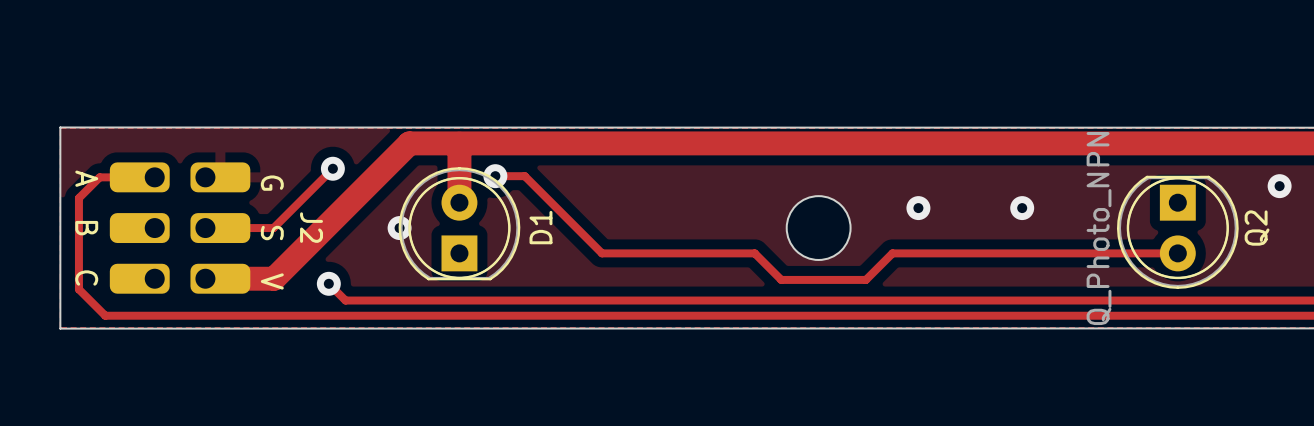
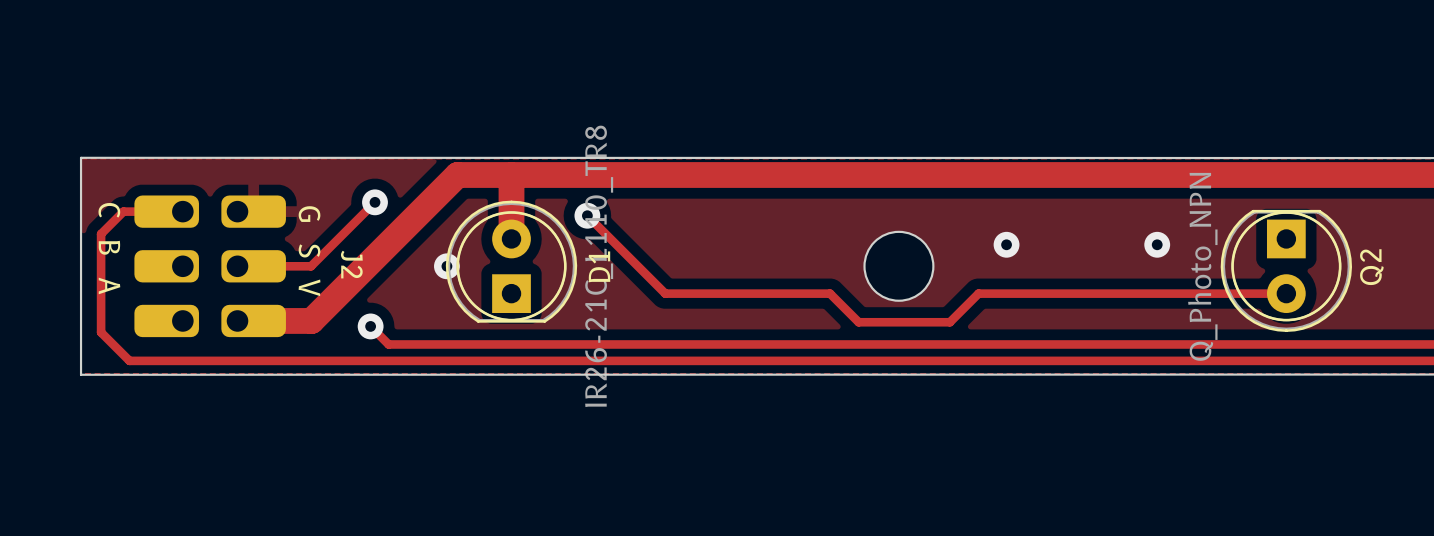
track: (495, 176) (524, 176) (529, 181) -> none
via position: (495, 176) -> (587, 215)
via: (1279, 186) -> none
via position: (1022, 208) -> (1157, 244)
D1 value: none -> IR26-21C_L110_TR8 (599, 266)
text: A B C (86, 228) -> C B A (109, 248)

